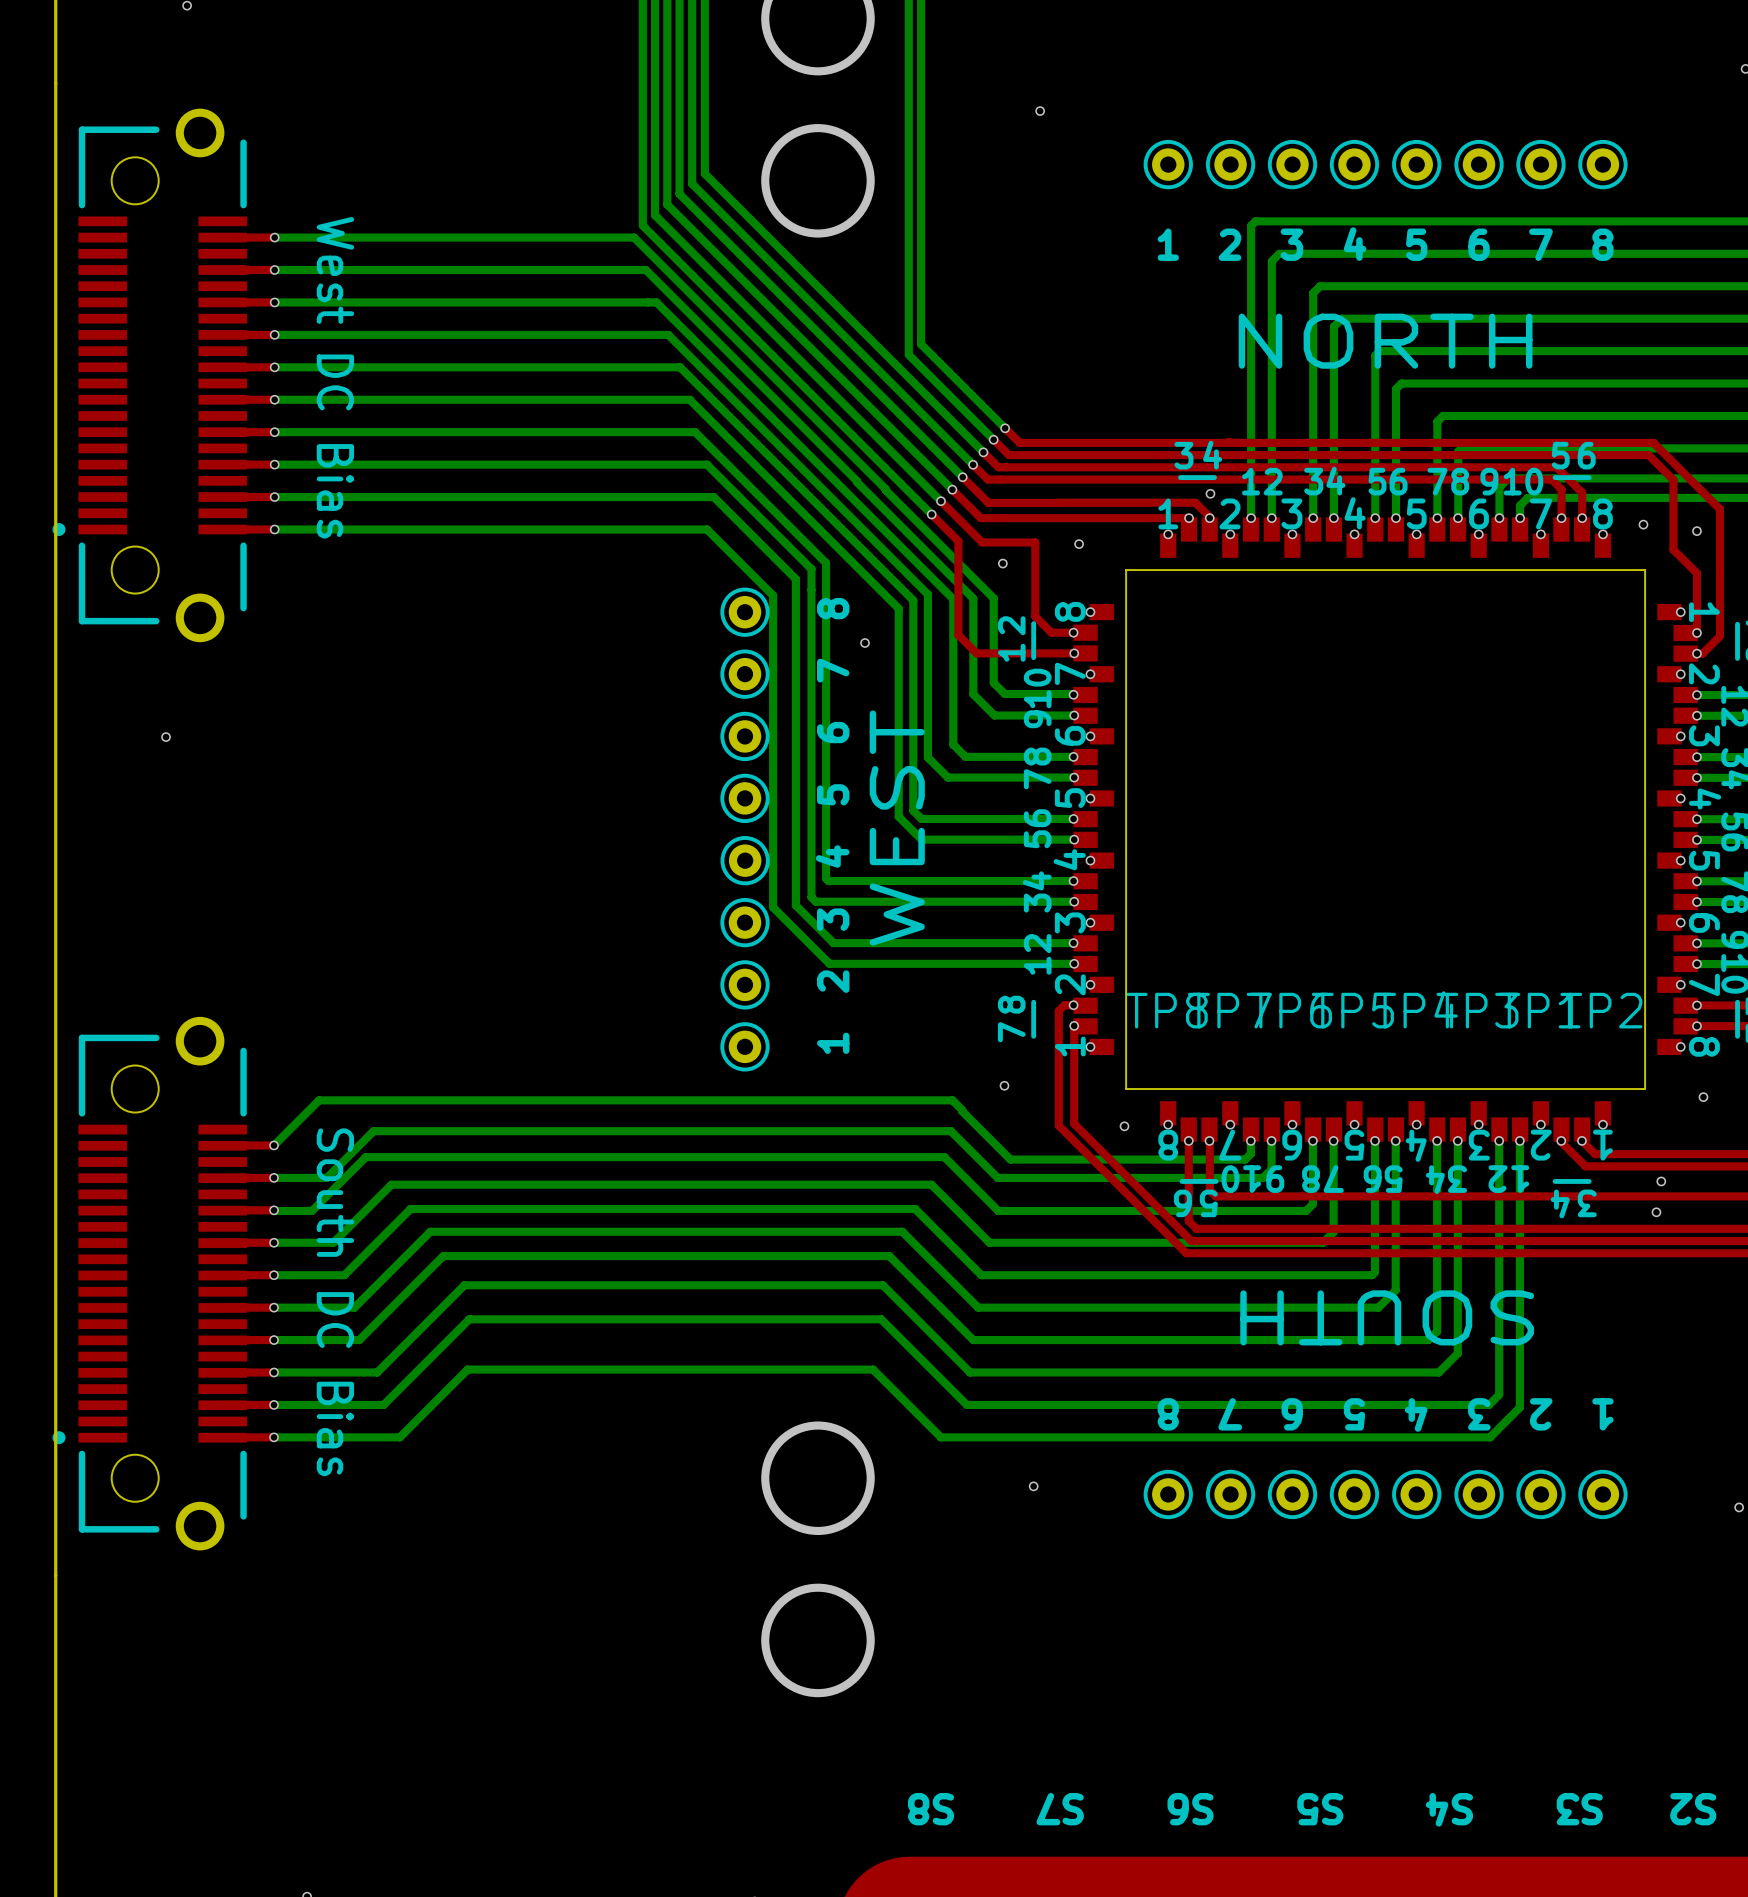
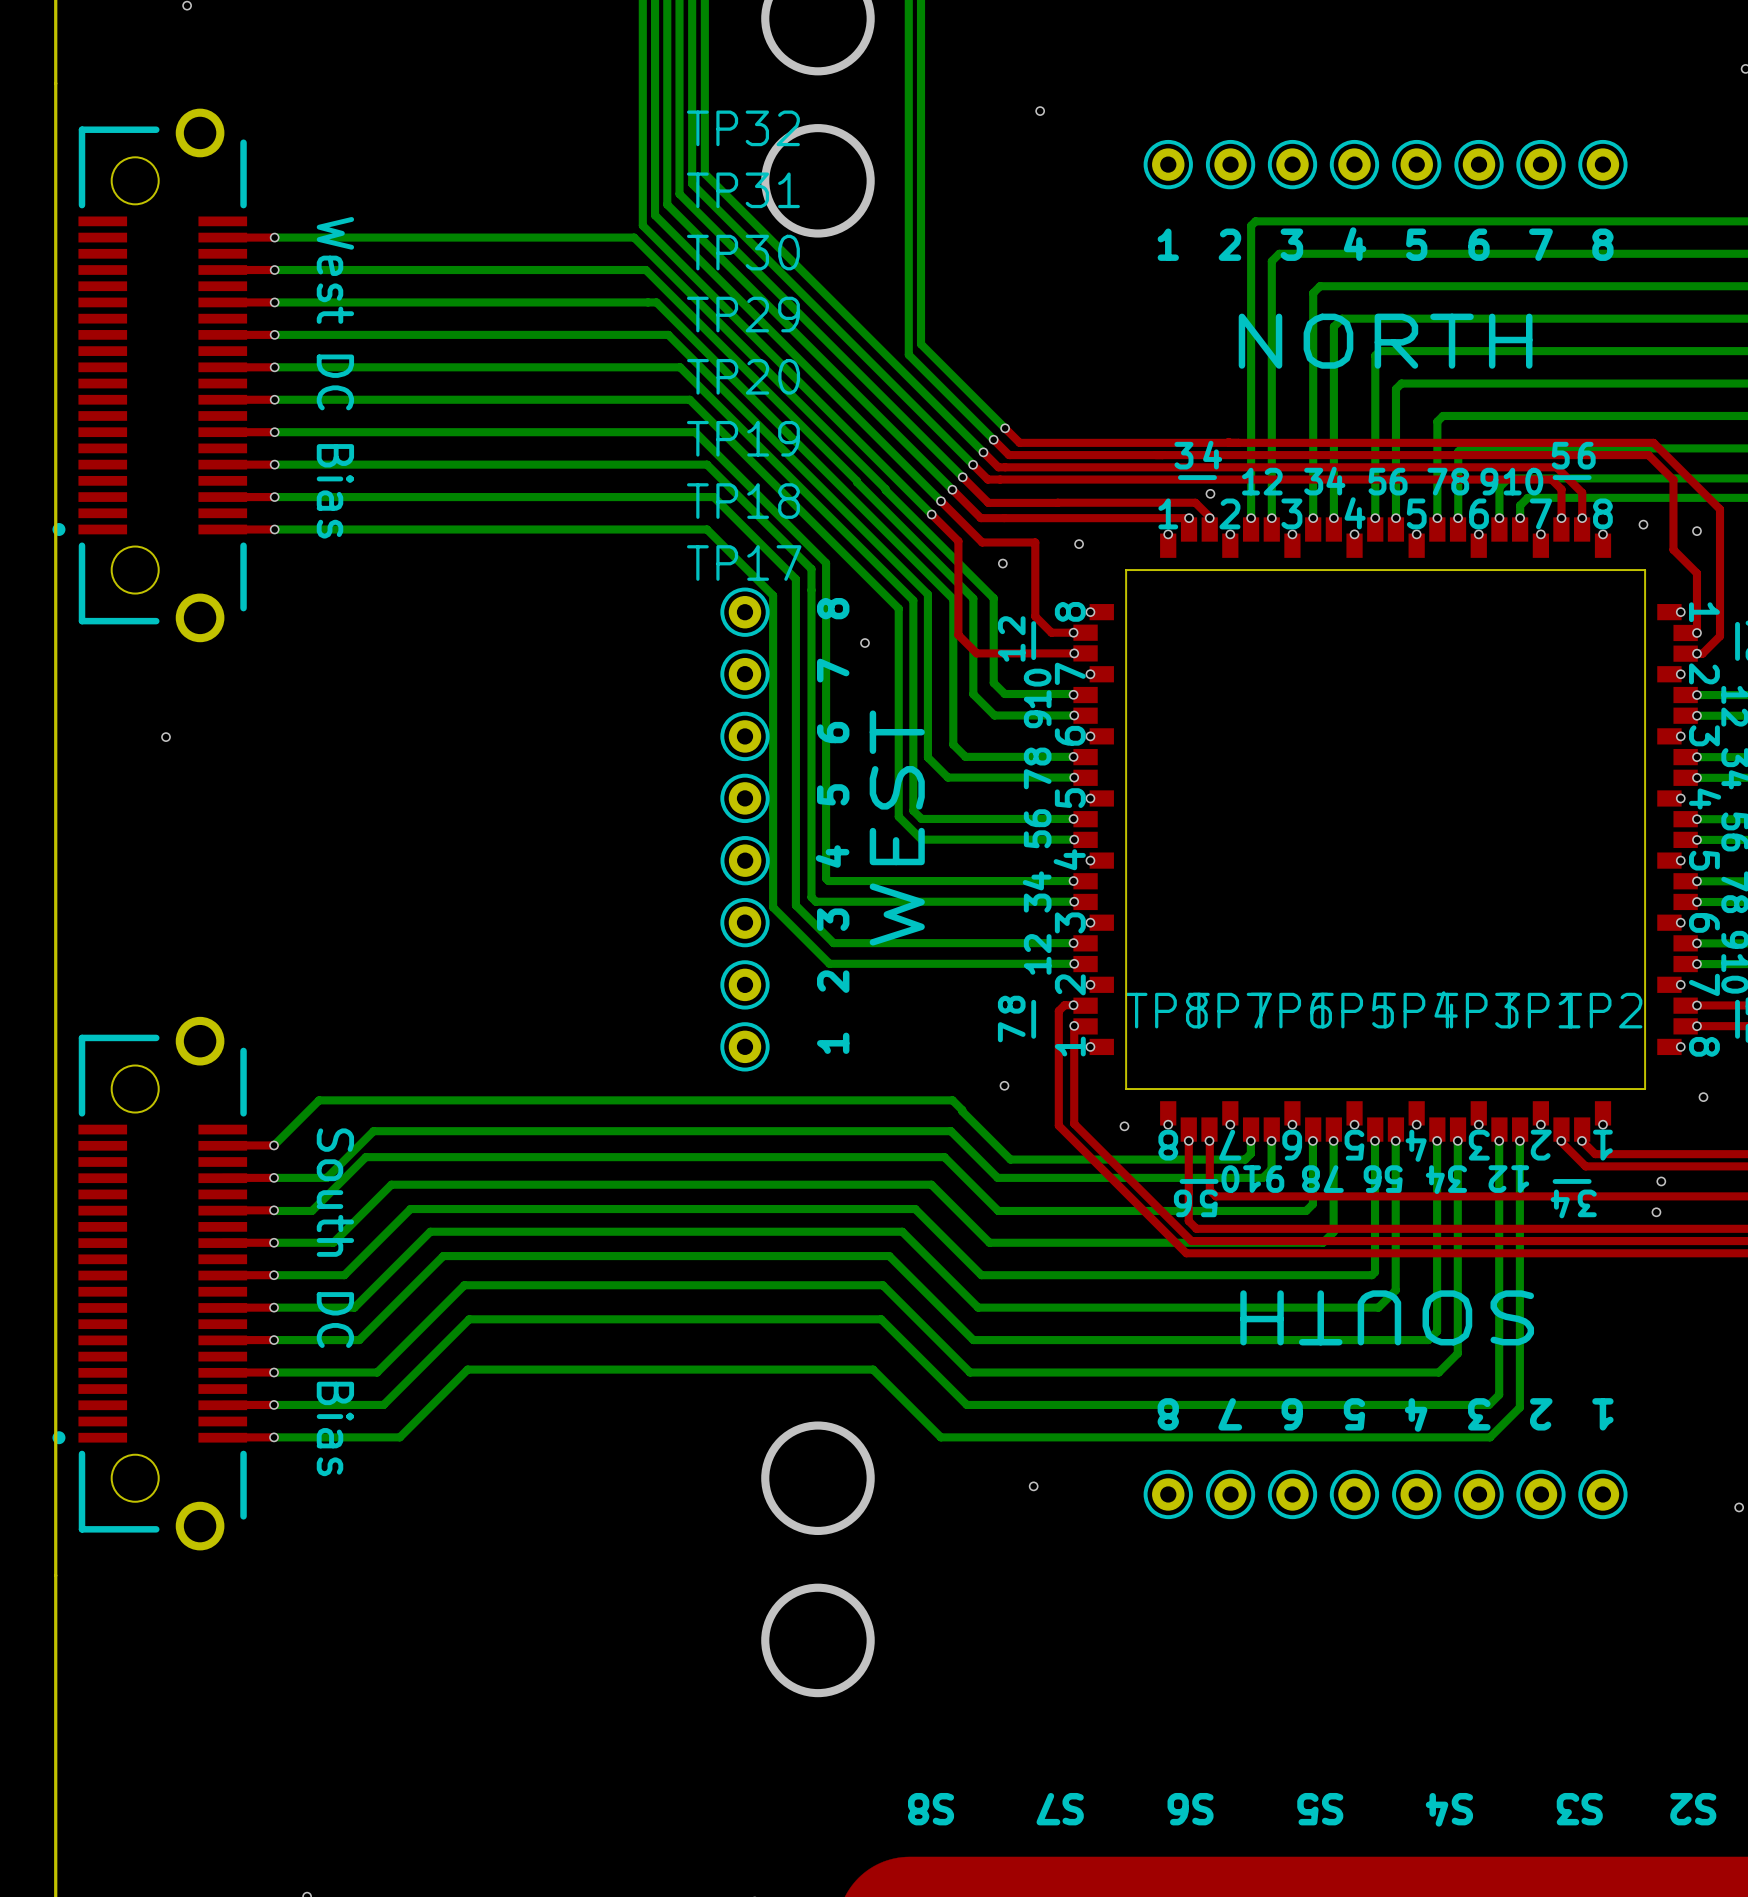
TP32 name: none -> TP32 (743, 128)
TP31 name: none -> TP31 (743, 190)
TP30 name: none -> TP30 (743, 252)
TP29 name: none -> TP29 (743, 314)
TP20 name: none -> TP20 (743, 376)
TP19 name: none -> TP19 (743, 438)
TP18 name: none -> TP18 (743, 501)
TP17 name: none -> TP17 (744, 562)

